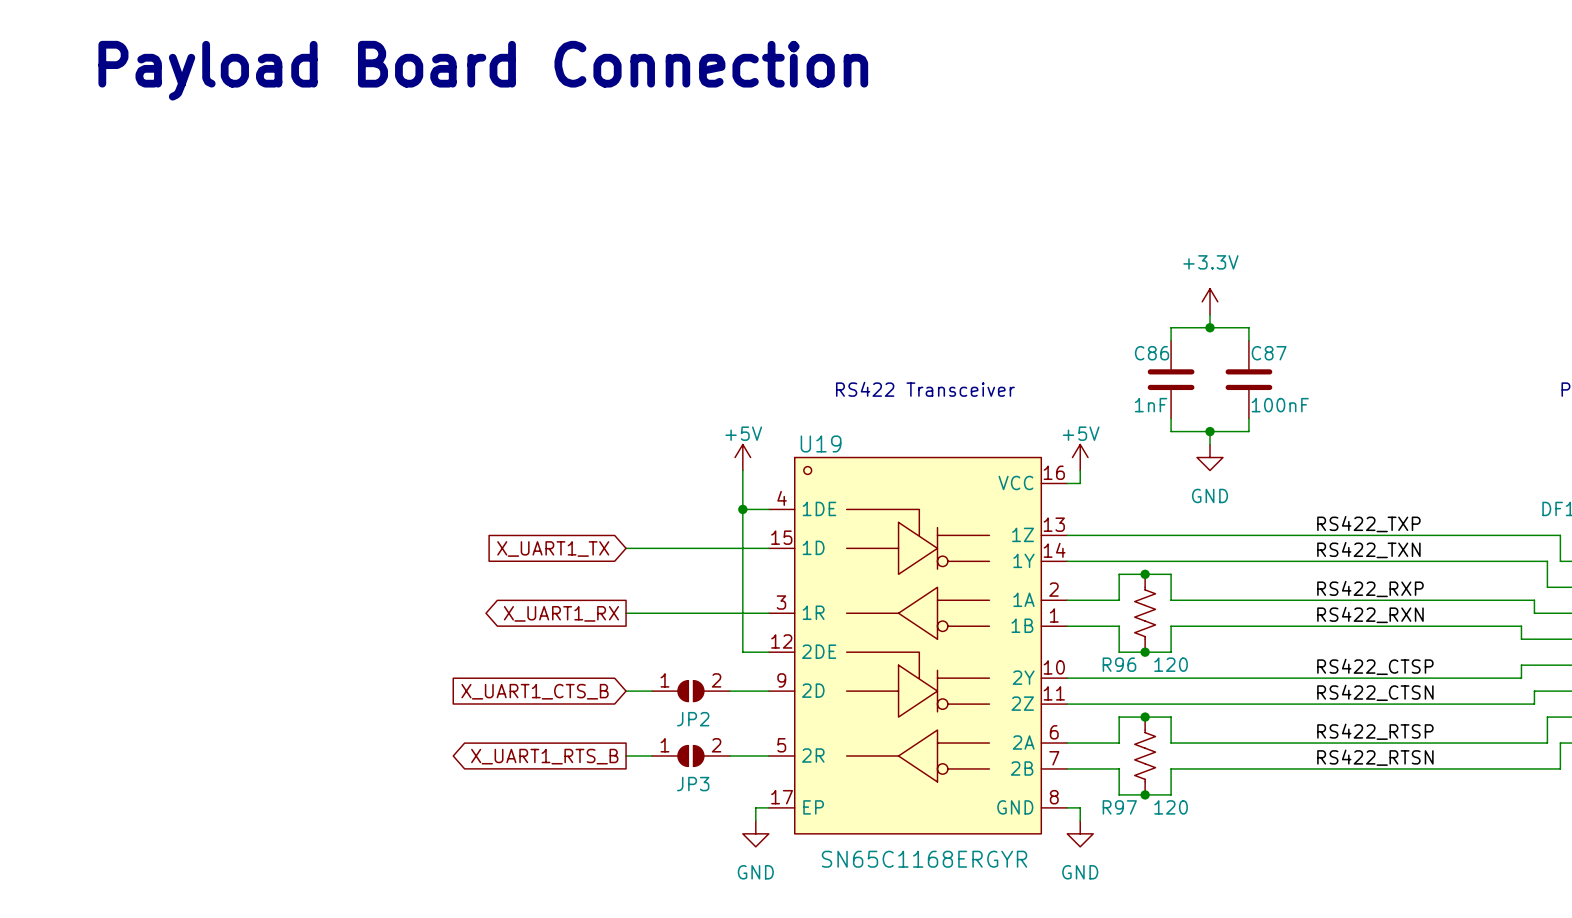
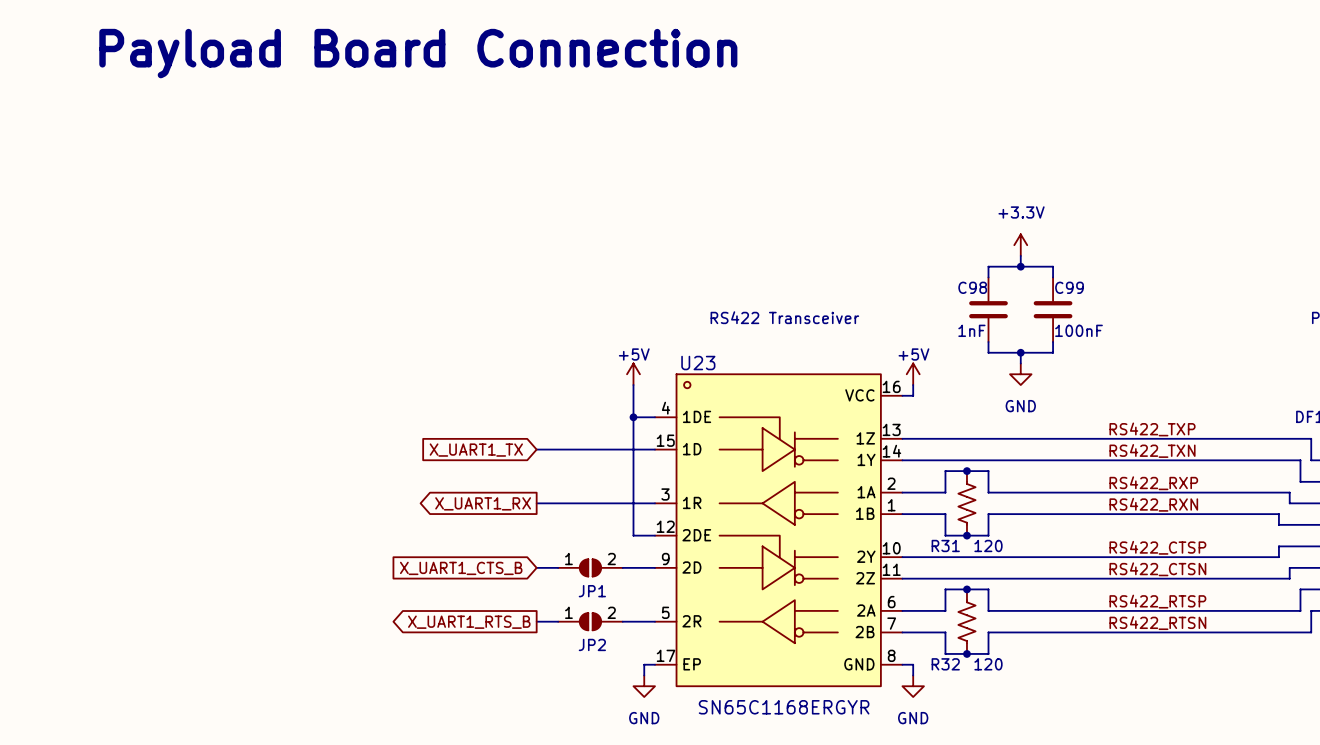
C86 name: C86 (1152, 353) -> C98 (972, 287)
C87 name: C87 (1269, 353) -> C99 (1069, 287)
U19 name: U19 (821, 443) -> U23 (698, 363)
R96 name: R96 (1119, 664) -> R31 (945, 545)
JP2 name: JP2 (693, 719) -> JP1 (592, 591)
JP3 name: JP3 (693, 784) -> JP2 (592, 644)
R97 name: R97 (1119, 807) -> R32 (945, 664)

